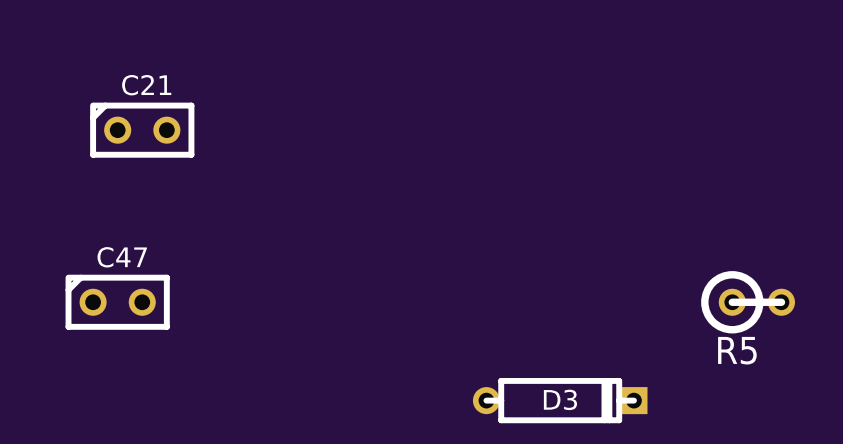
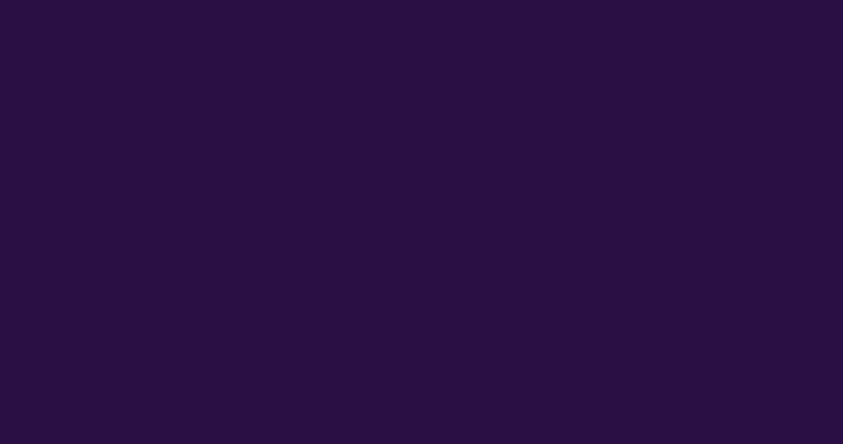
C21: (142, 130) -> none
C47: (117, 302) -> none
R5: (748, 302) -> none
D3: (560, 400) -> none

